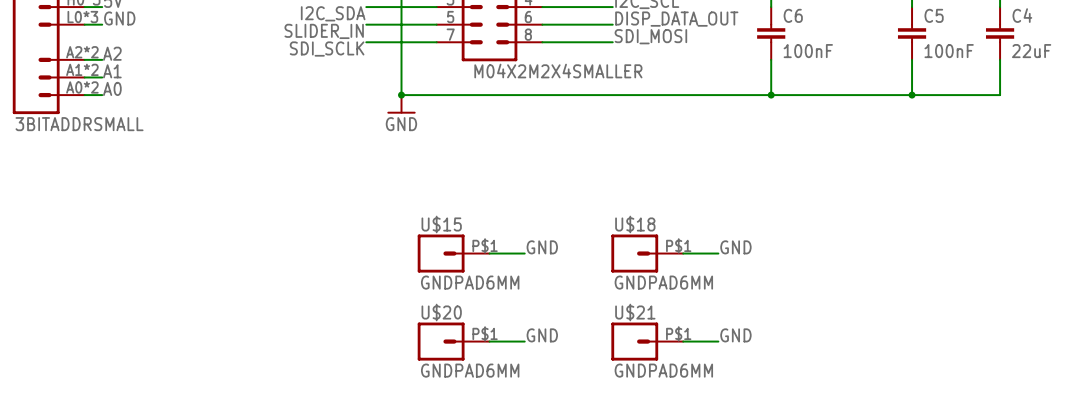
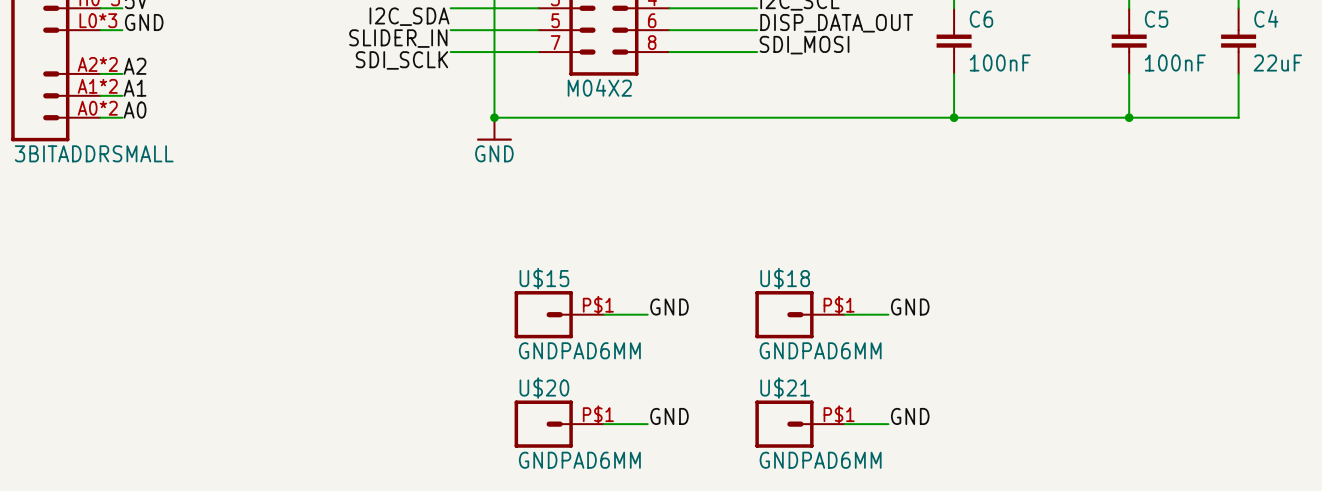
part value: M04X2M2X4SMALLER (558, 71) -> M04X2 (599, 87)

